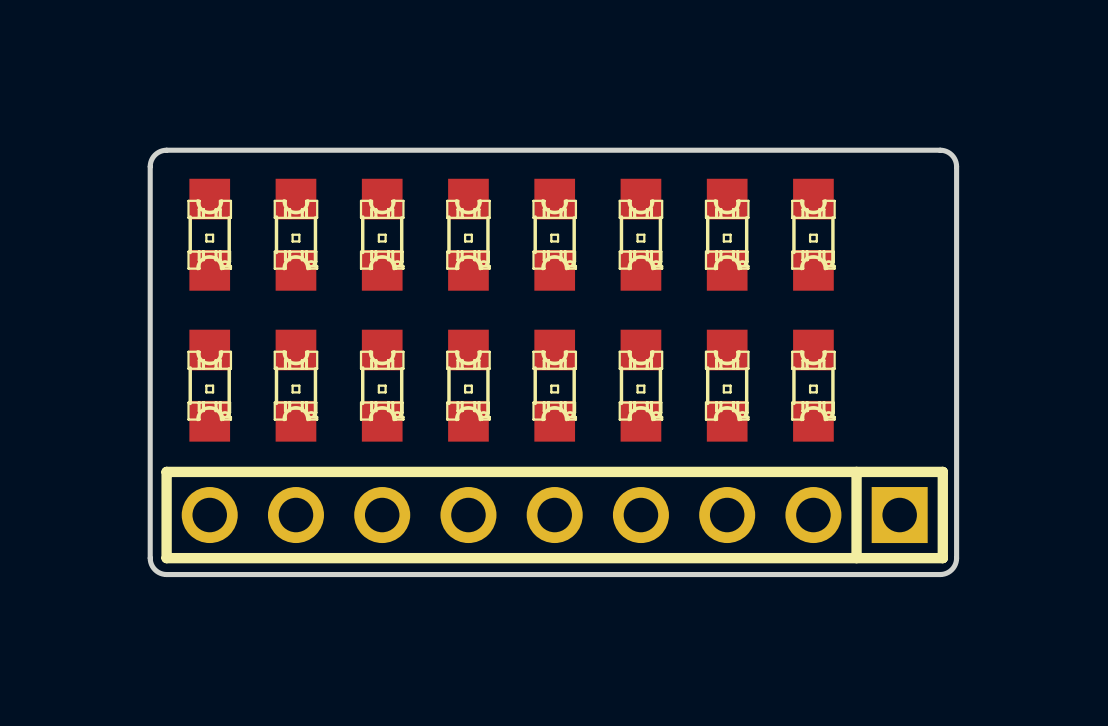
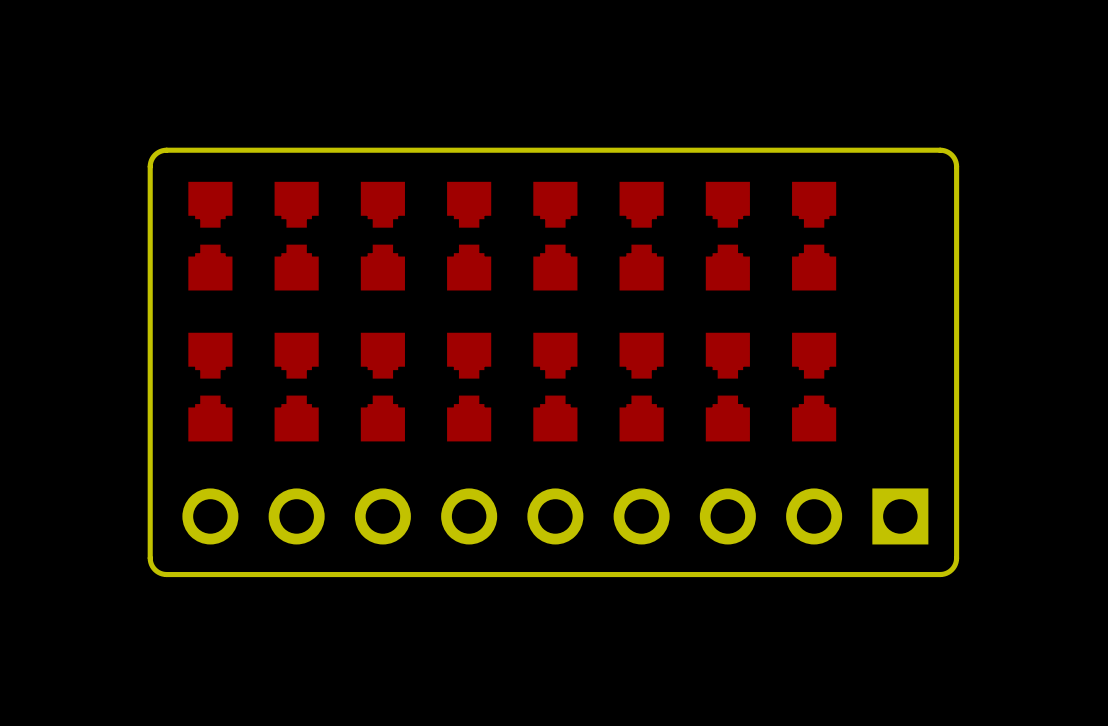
part footprint: [187, 178, 233, 291] -> [188, 181, 233, 291]
part footprint: [273, 178, 319, 291] -> [274, 181, 319, 291]
part footprint: [359, 178, 405, 291] -> [360, 181, 405, 291]
part footprint: [446, 178, 491, 291] -> [447, 181, 492, 291]
part footprint: [532, 178, 578, 291] -> [533, 181, 578, 291]
part footprint: [618, 178, 664, 291] -> [619, 181, 664, 291]
part footprint: [704, 178, 750, 291] -> [705, 181, 750, 291]
part footprint: [791, 178, 836, 291] -> [792, 181, 837, 291]
part footprint: [187, 329, 233, 442] -> [188, 332, 233, 442]
part footprint: [273, 329, 319, 442] -> [274, 332, 319, 442]
part footprint: [359, 329, 405, 442] -> [360, 332, 405, 442]
part footprint: [446, 329, 491, 442] -> [447, 332, 492, 442]
part footprint: [532, 329, 578, 442] -> [533, 332, 578, 442]
part footprint: [618, 329, 664, 442] -> [619, 332, 664, 442]
part footprint: [704, 329, 750, 442] -> [705, 332, 750, 442]
part footprint: [791, 329, 836, 442] -> [792, 332, 837, 442]
part footprint: [161, 466, 948, 564] -> [182, 488, 929, 545]

